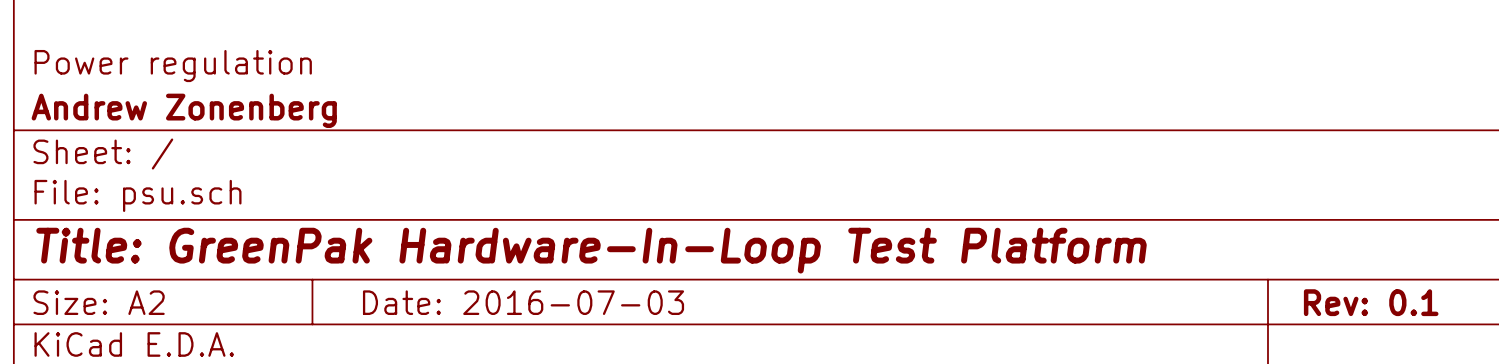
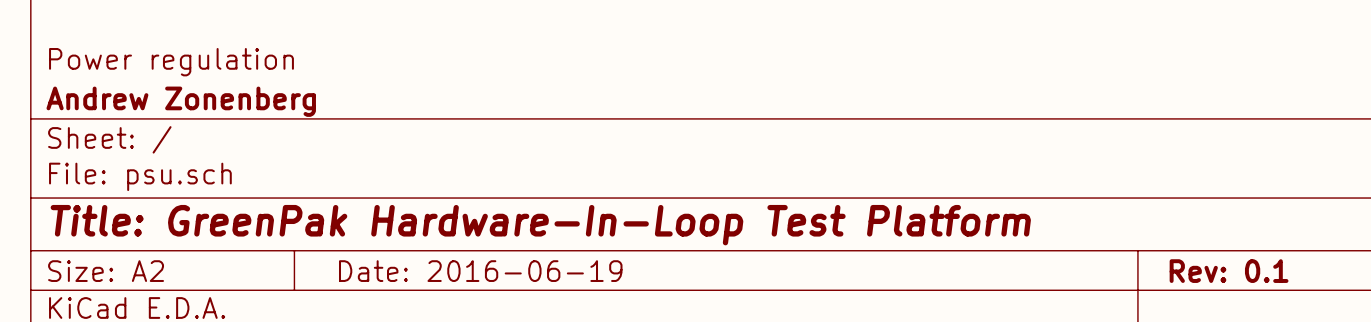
title block: Date: 2016-07-03 (523, 302) -> Date: 2016-06-19 (480, 271)

